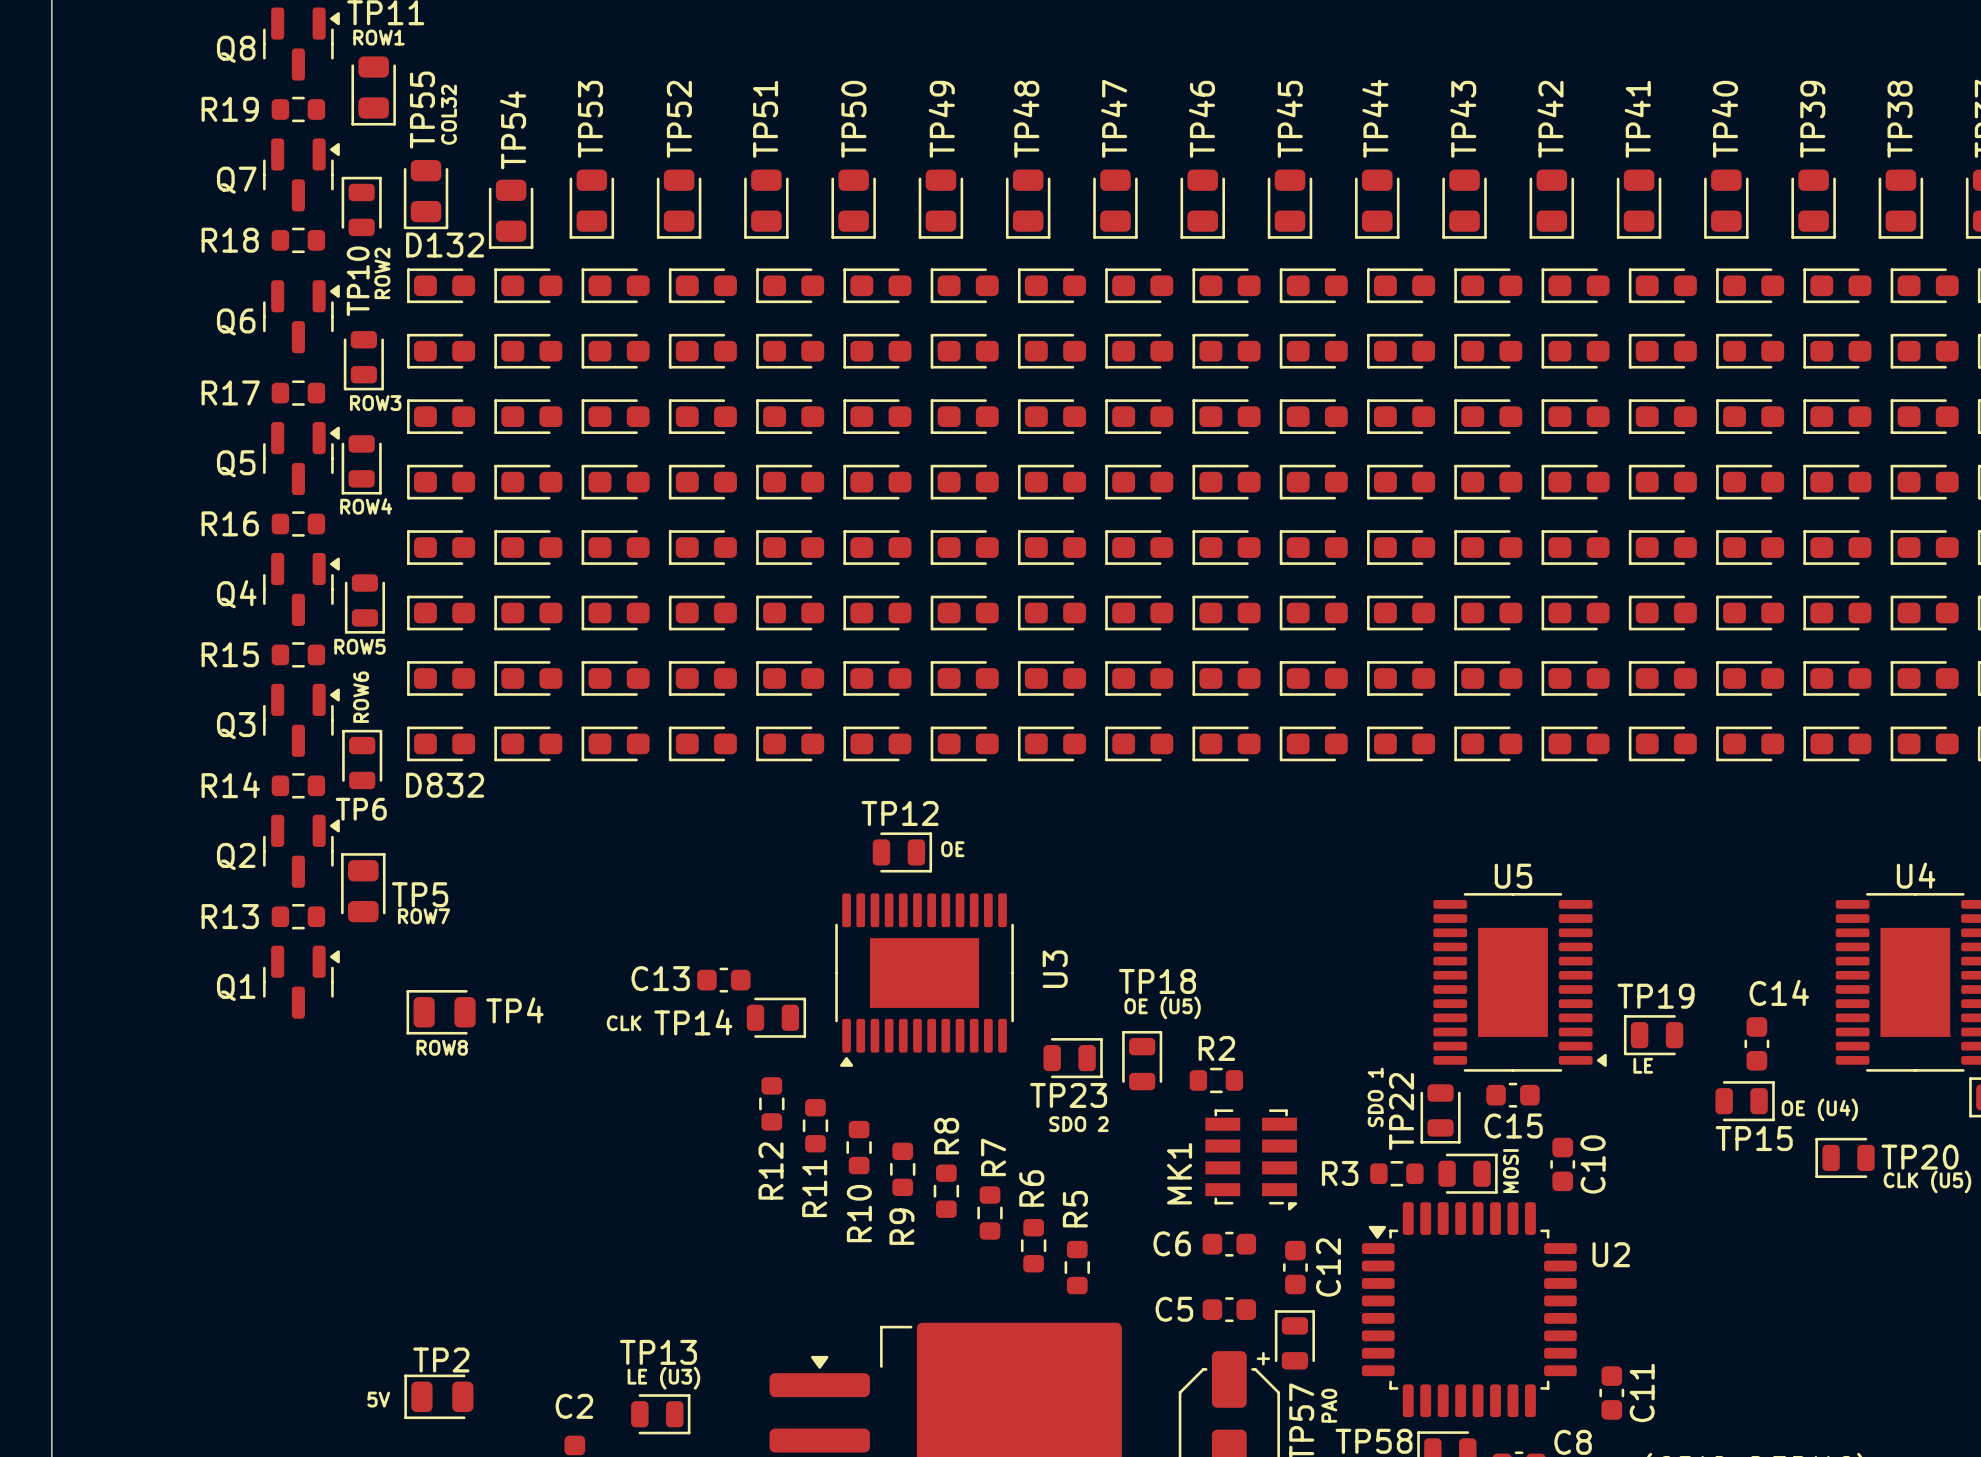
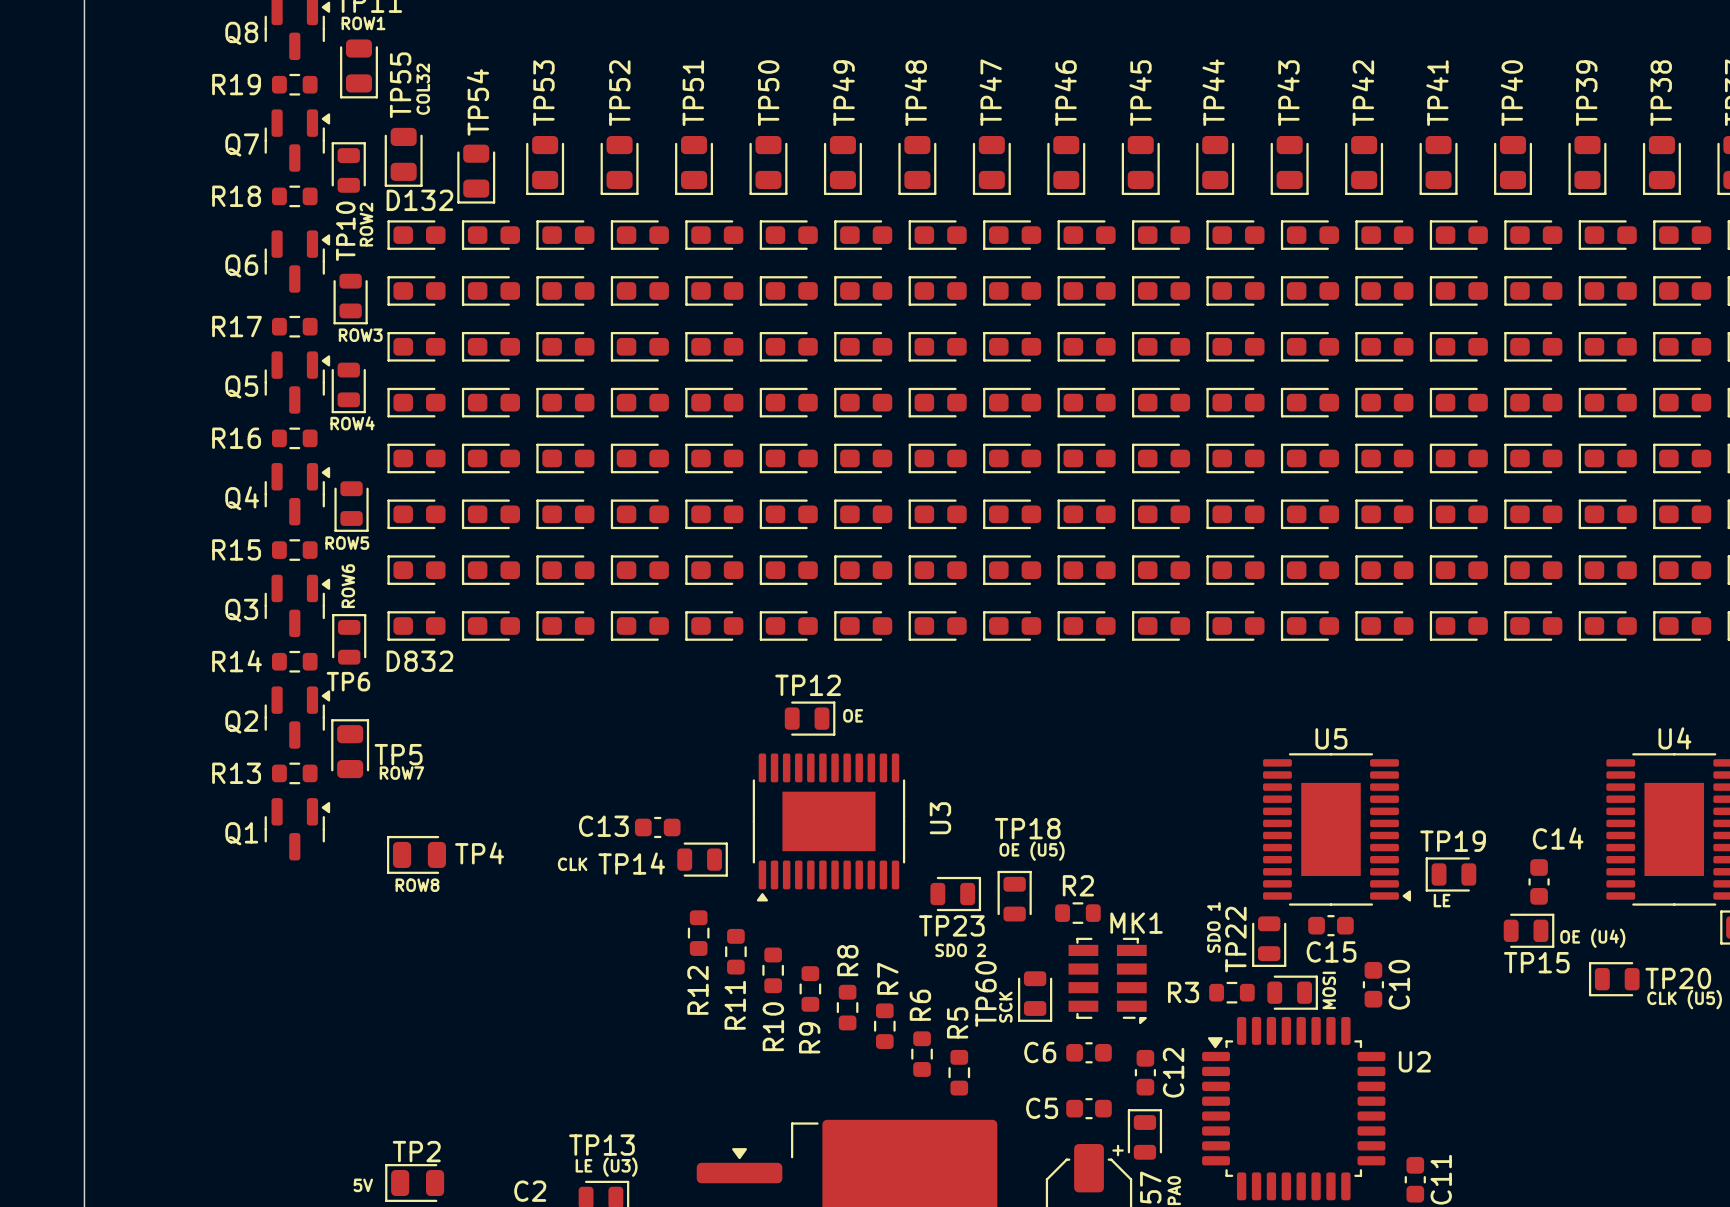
MK1 name rotation: 0° (1179, 1173) -> 90° clockwise (1136, 923)
MK1 name position: MK1 (1179, 1173) -> MK1 (1136, 923)
TP60: none -> (1035, 996)
text: none -> SCK (1005, 1007)

